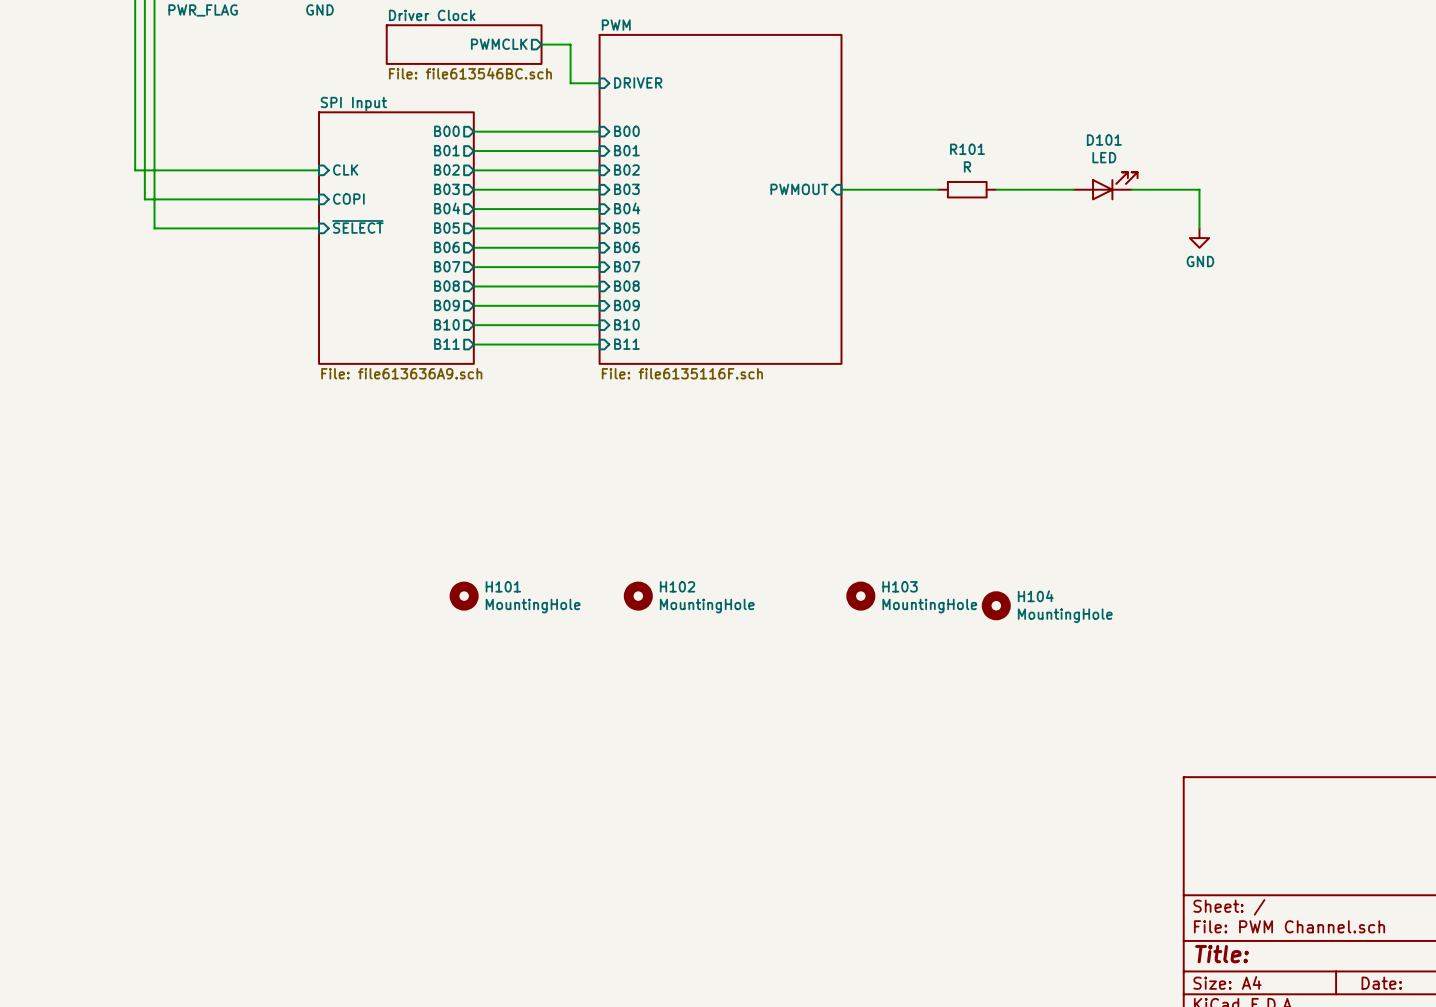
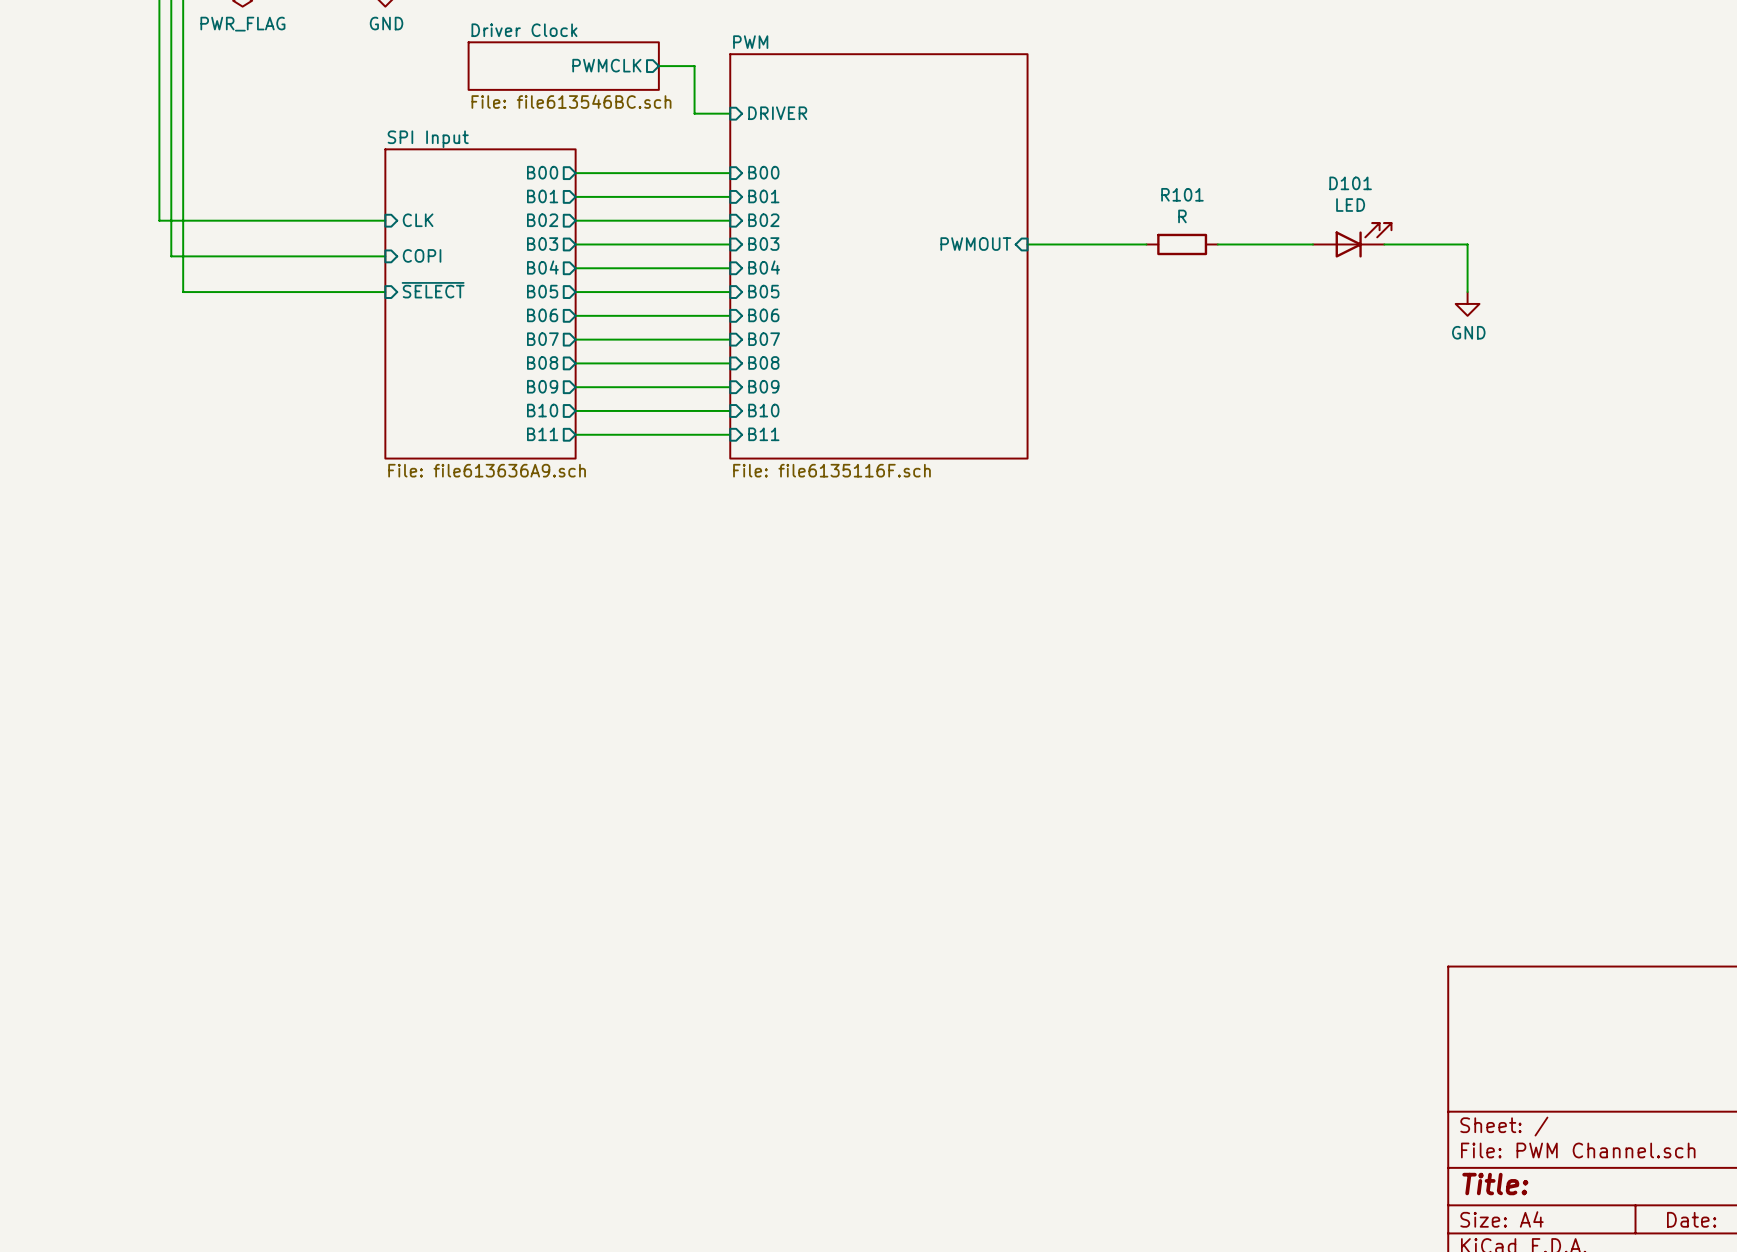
H101: MountingHole (464, 596) -> none
H102: MountingHole (638, 596) -> none
H103: MountingHole (860, 596) -> none
H104: MountingHole (996, 605) -> none

